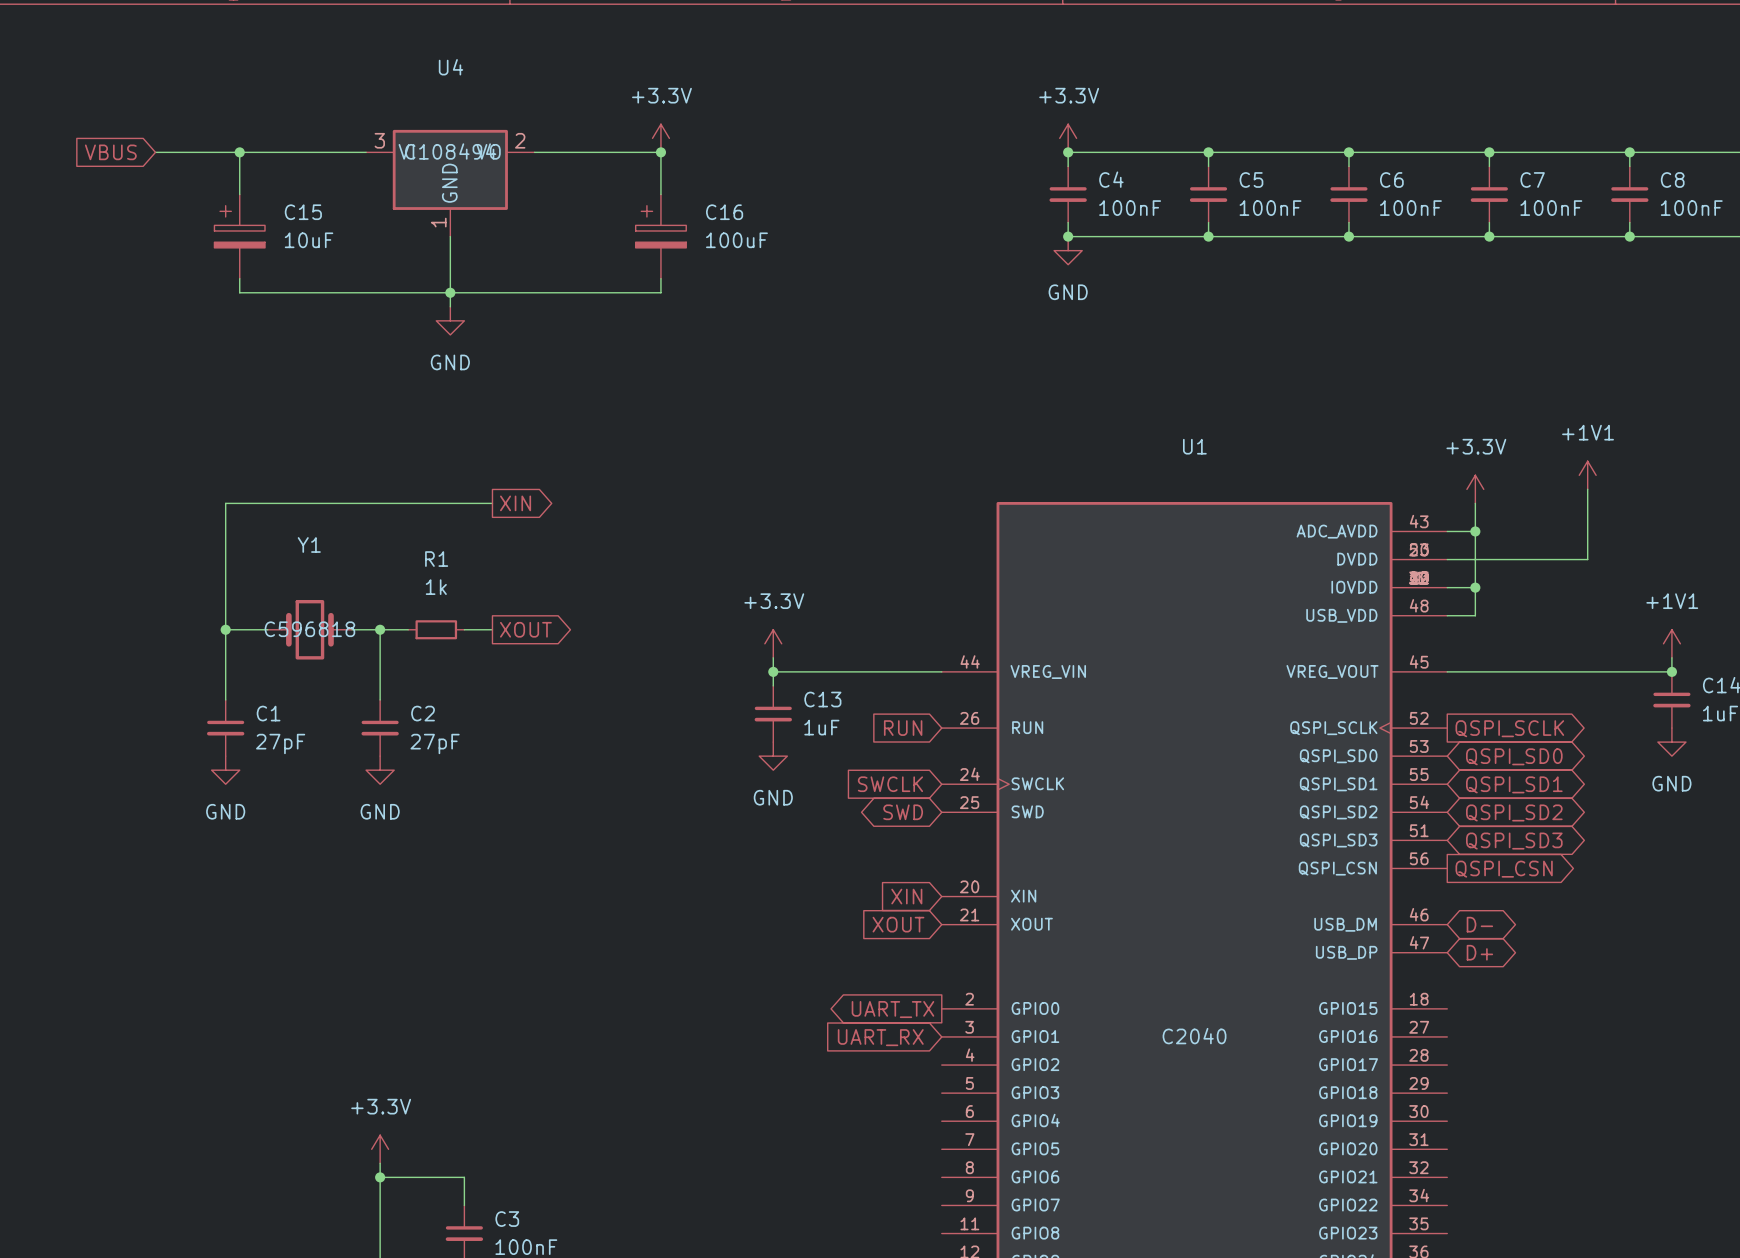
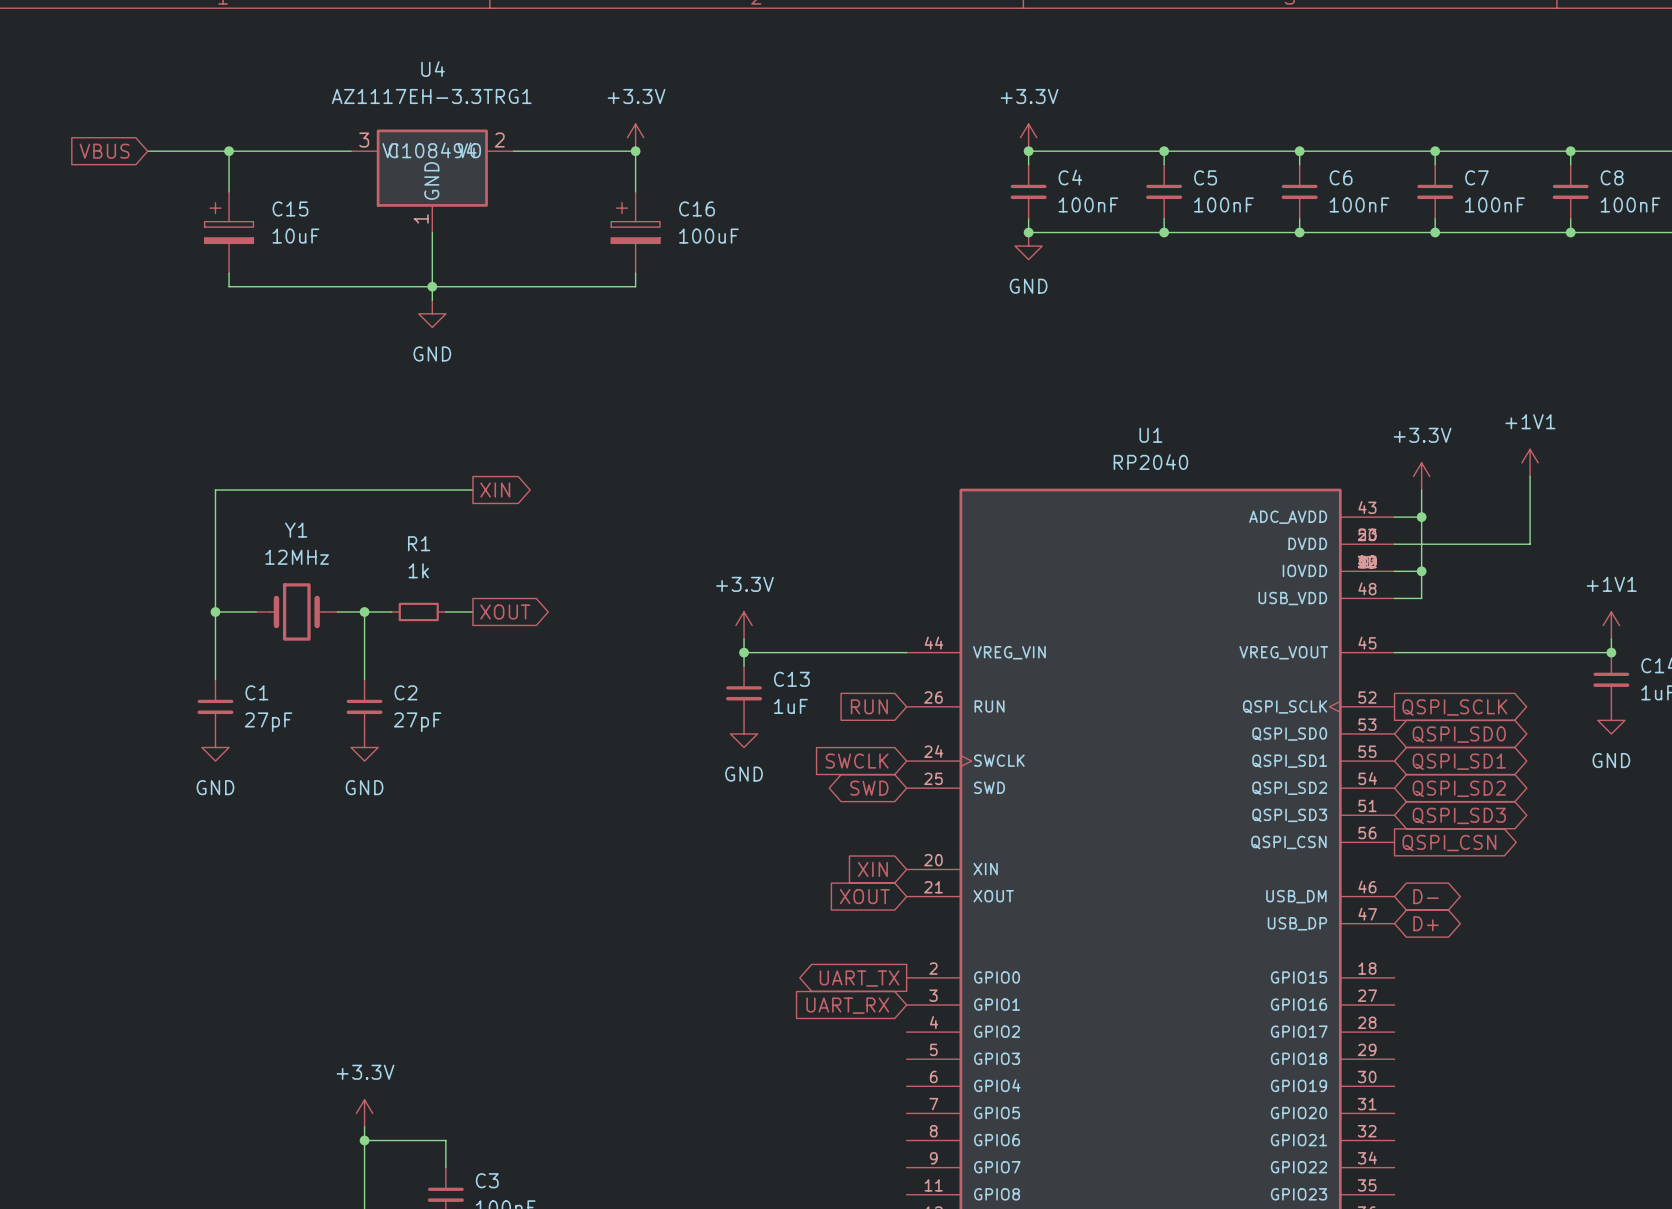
U4 value: none -> AZ1117EH-3.3TRG1 (431, 96)
U1 value: none -> RP2040 (1150, 462)
Y1 value: none -> 12MHz (297, 557)
Y1 text: C596818 (309, 629) -> none
U1 text: C2040 (1194, 1036) -> none

